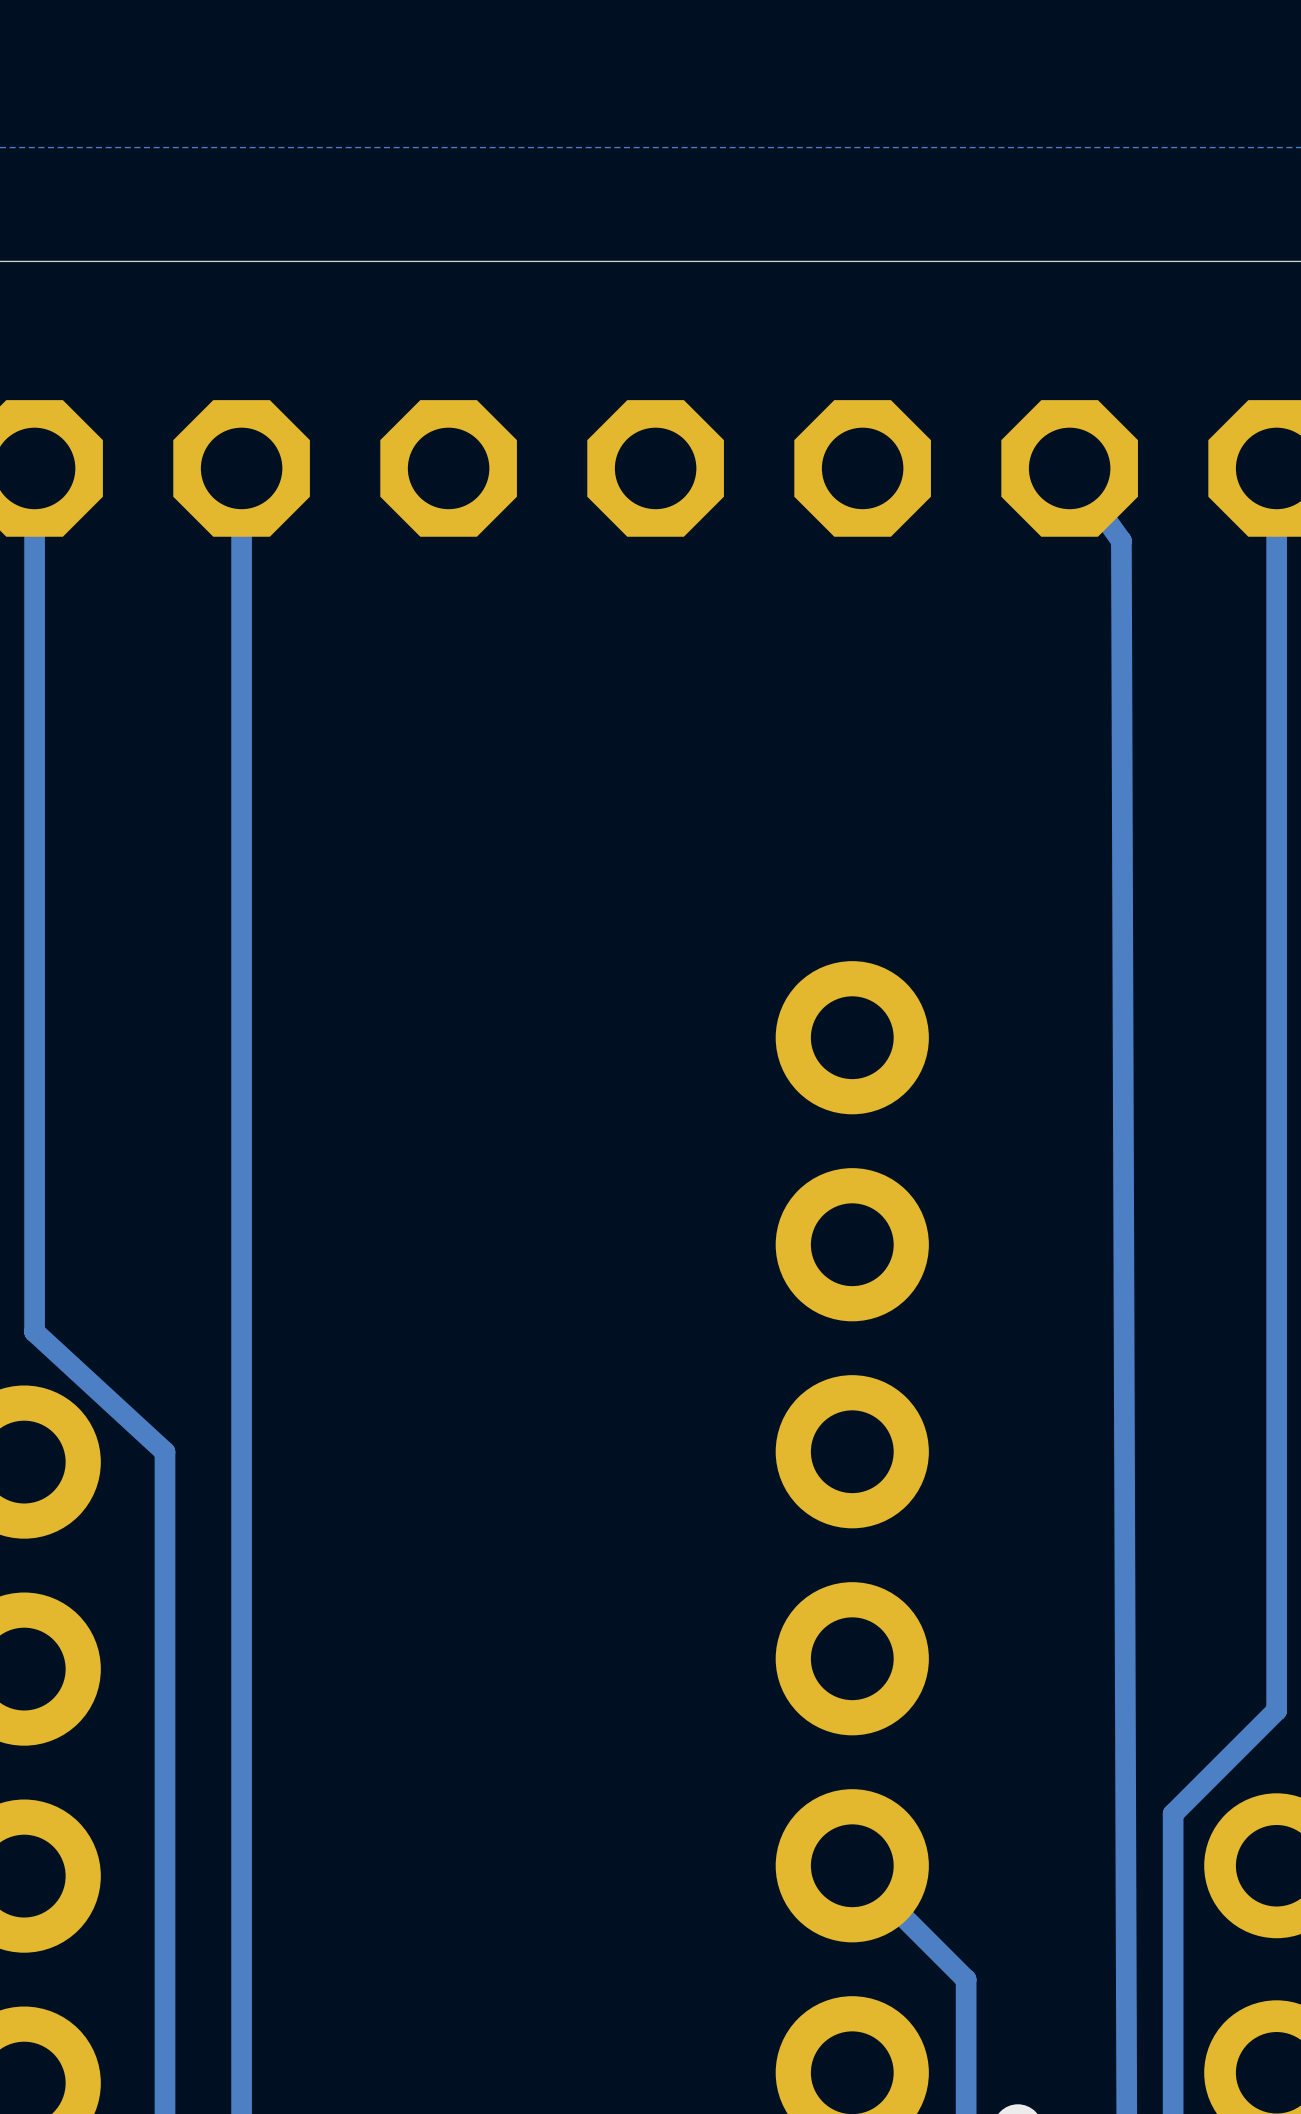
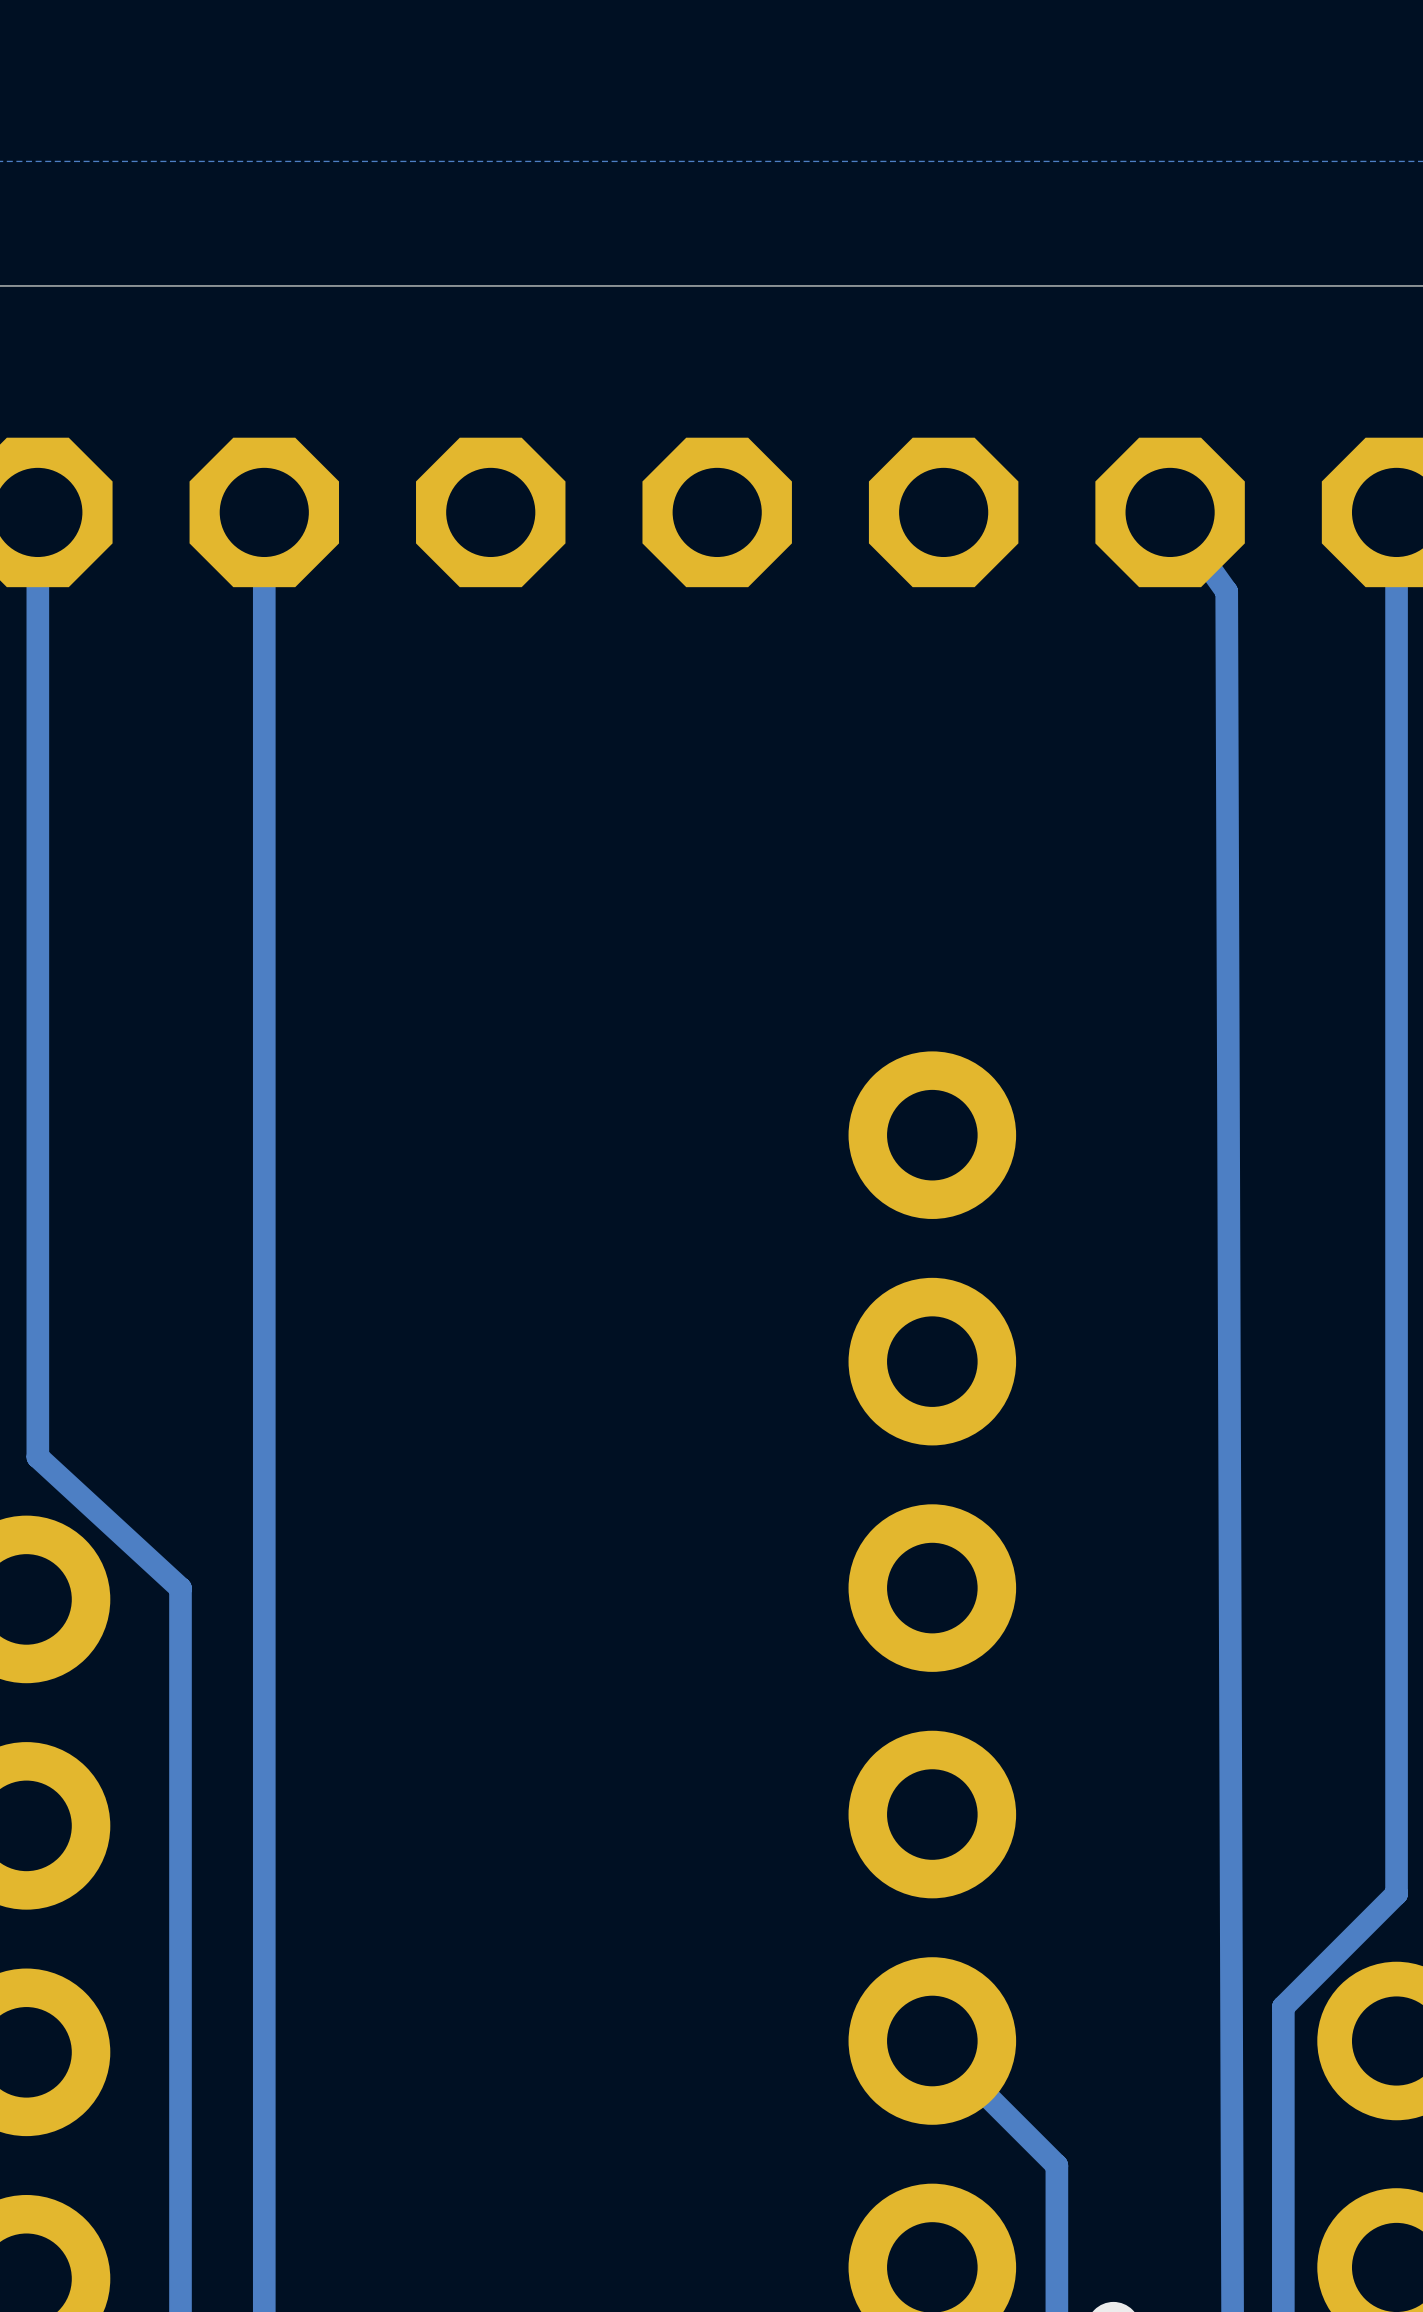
track: (1276, 1710) (1173, 1814) (1173, 1834) -> (1396, 1871) (1396, 1893) (1283, 2007)

